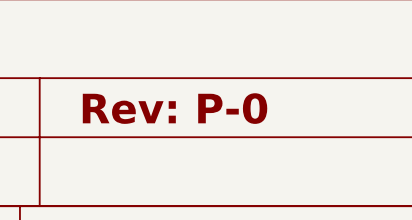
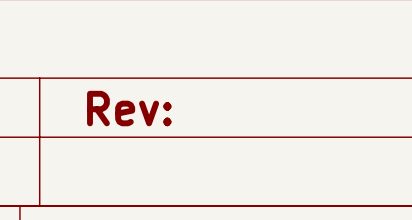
title block: Rev: P-0 (175, 108) -> Rev: (129, 108)

